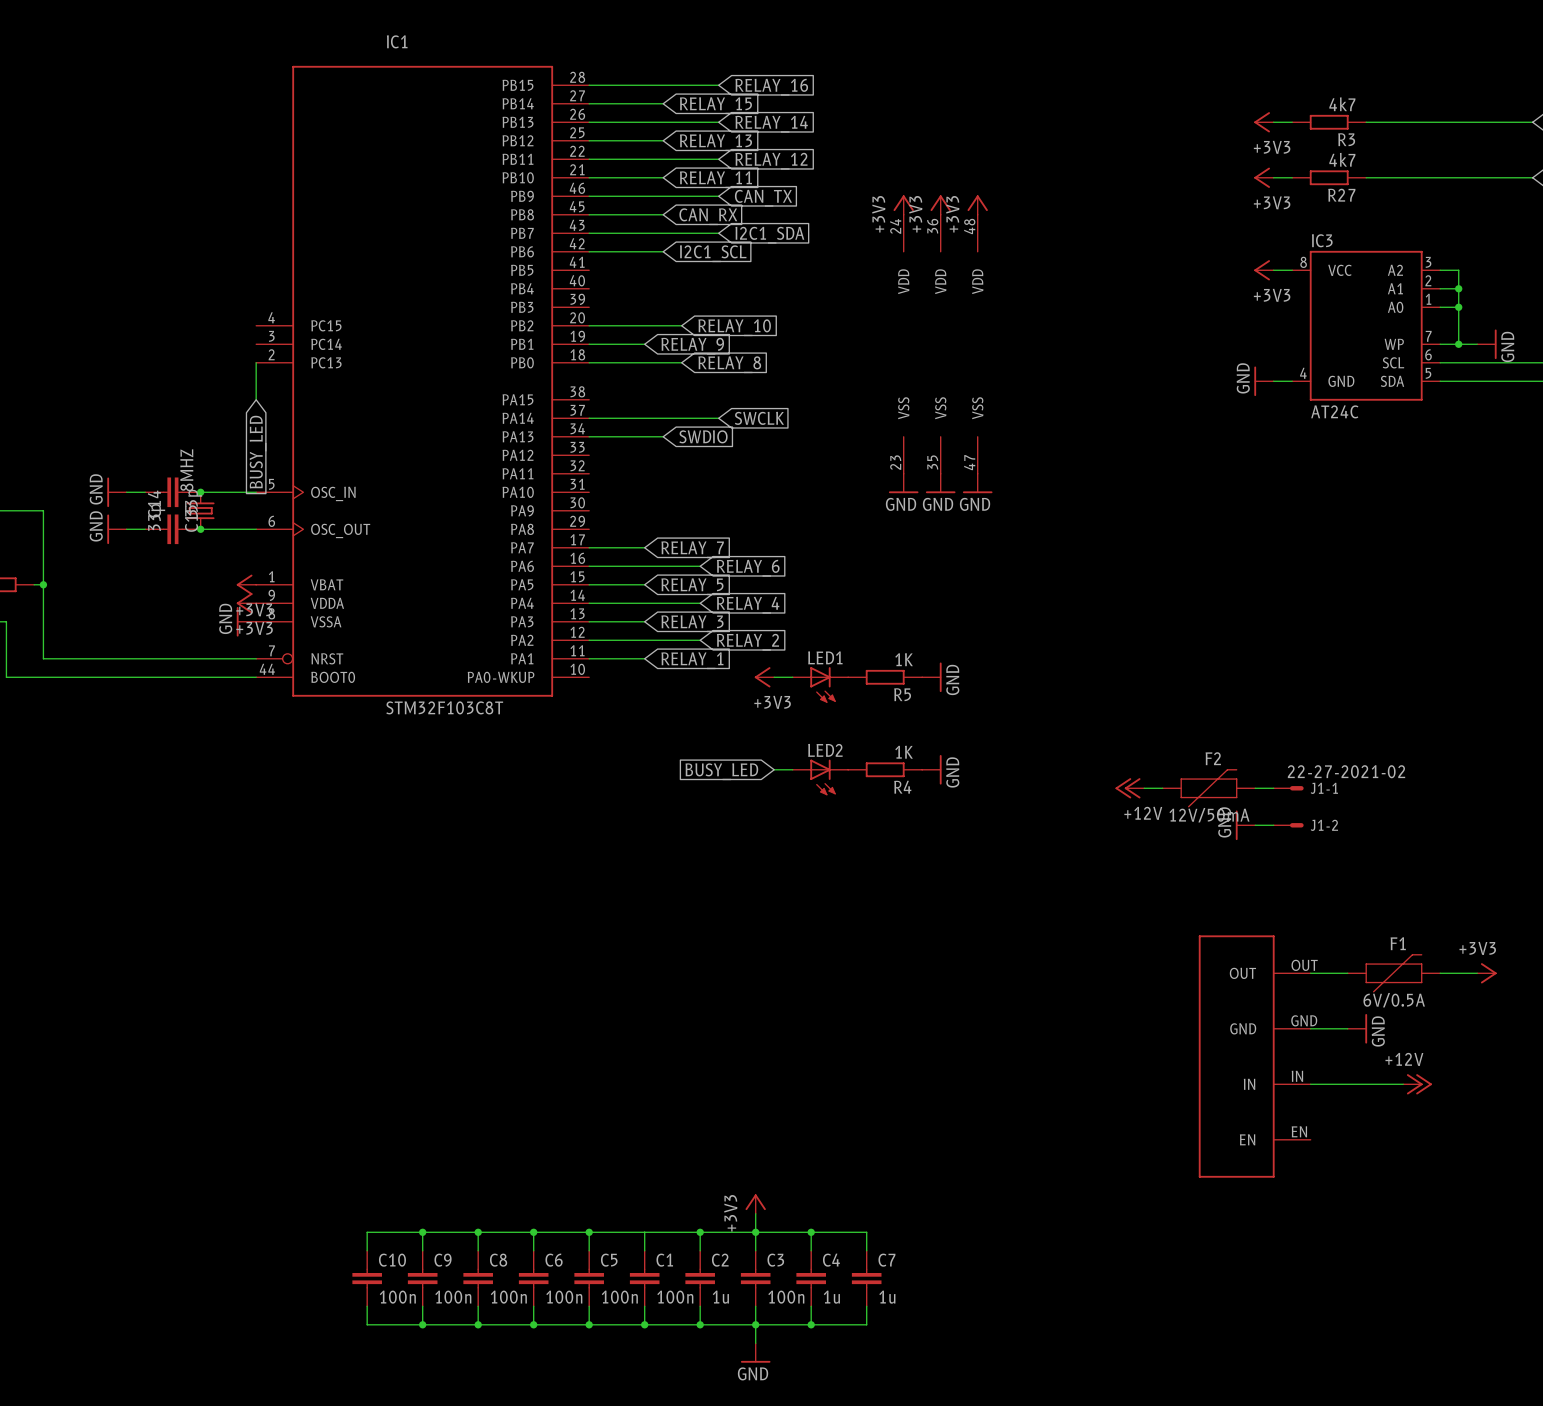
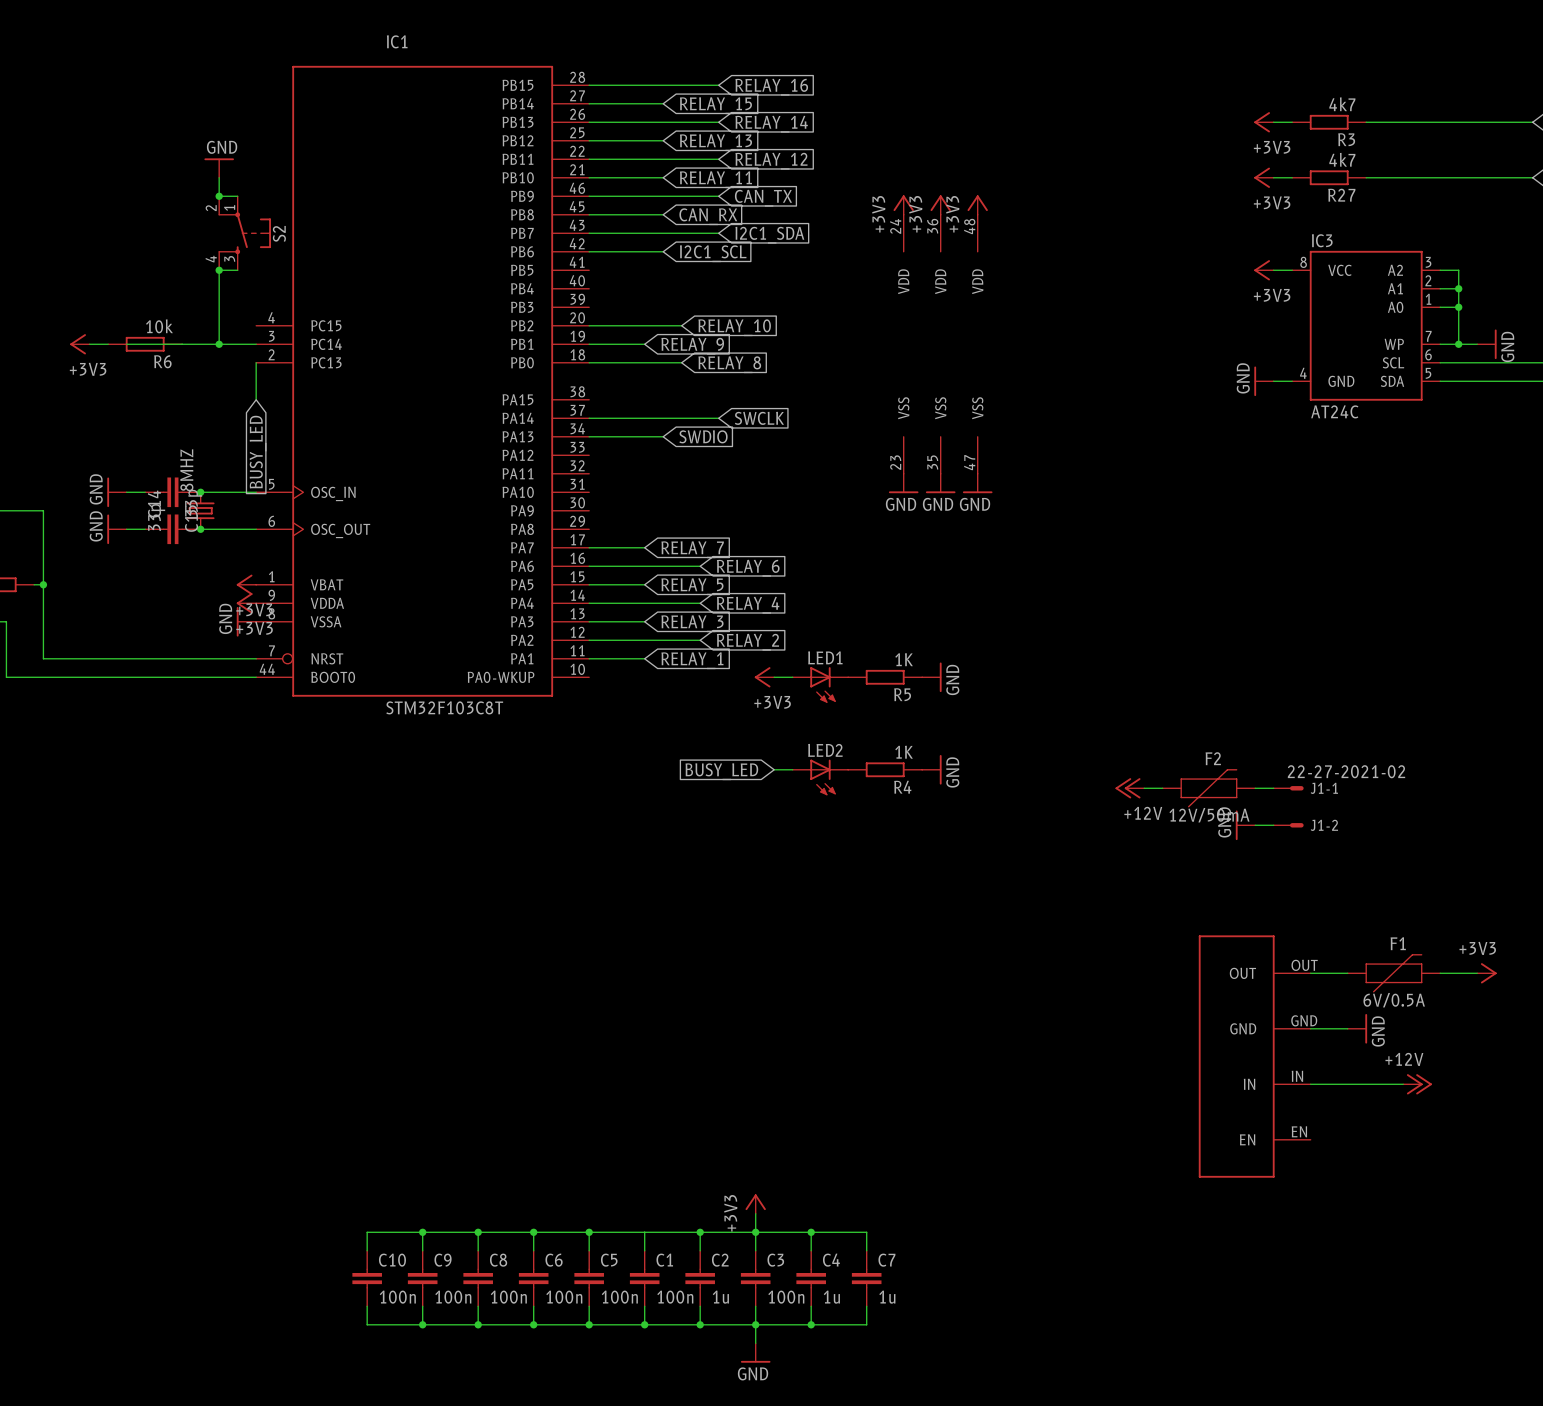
power symbol: none -> GND (219, 168)
wire: none -> (219, 177) (219, 196) (237, 196)
junction: none -> (219, 196)
S2: none -> (244, 233)
junction: none -> (219, 270)
wire: none -> (237, 270) (219, 270) (219, 344)
power symbol: none -> +3V3 (79, 344)
wire: none -> (89, 344) (108, 344)
wire: none -> (126, 344) (256, 344)
R6: none -> 10k (145, 344)
junction: none -> (219, 344)

